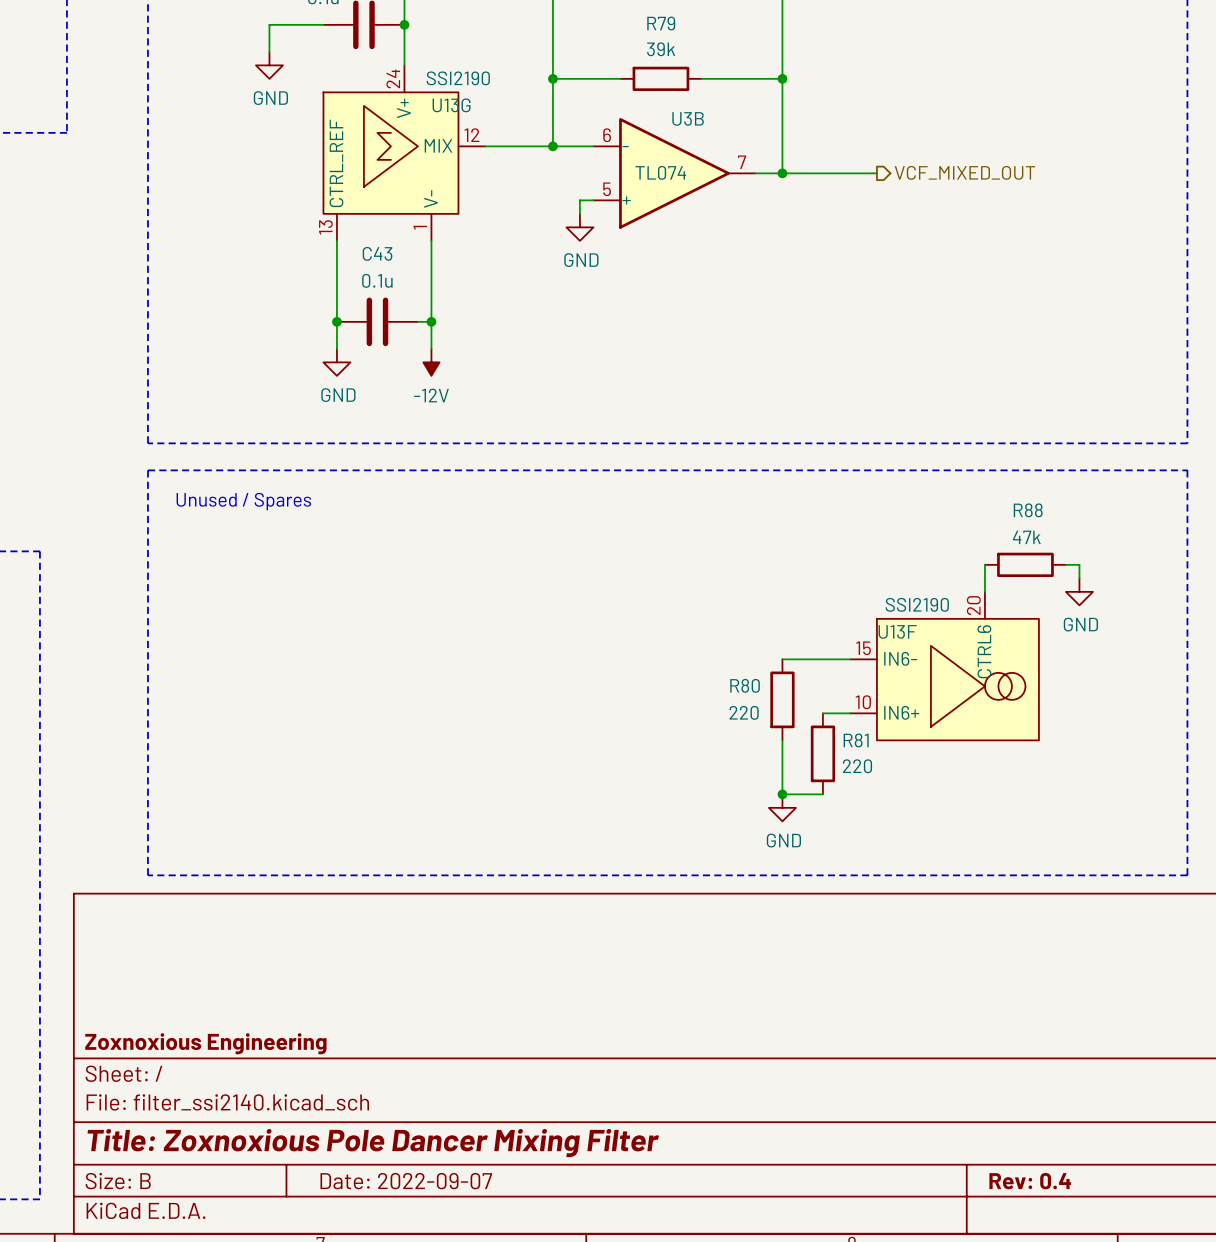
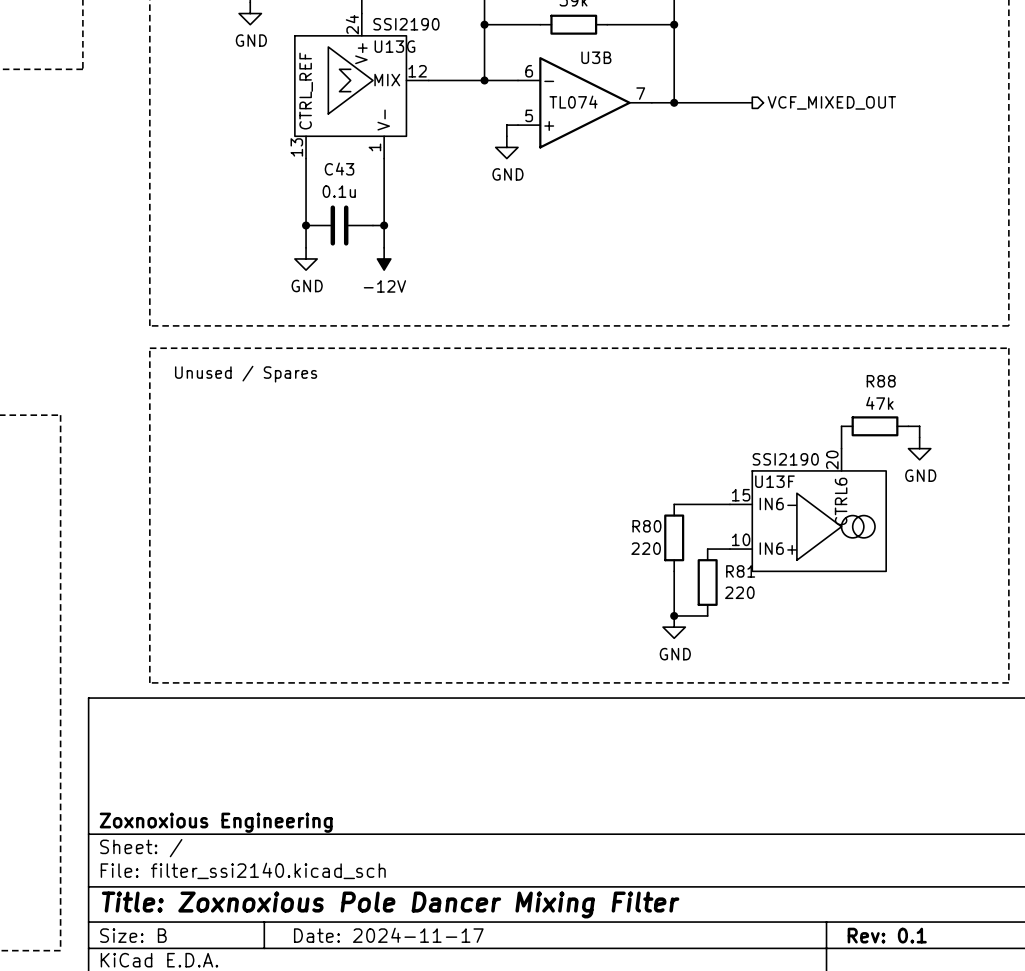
title block: Date: 2022-09-07 (406, 1181) -> Date: 2024-11-17 (388, 935)
title block: Rev: 0.4 (1030, 1181) -> Rev: 0.1 (887, 935)

